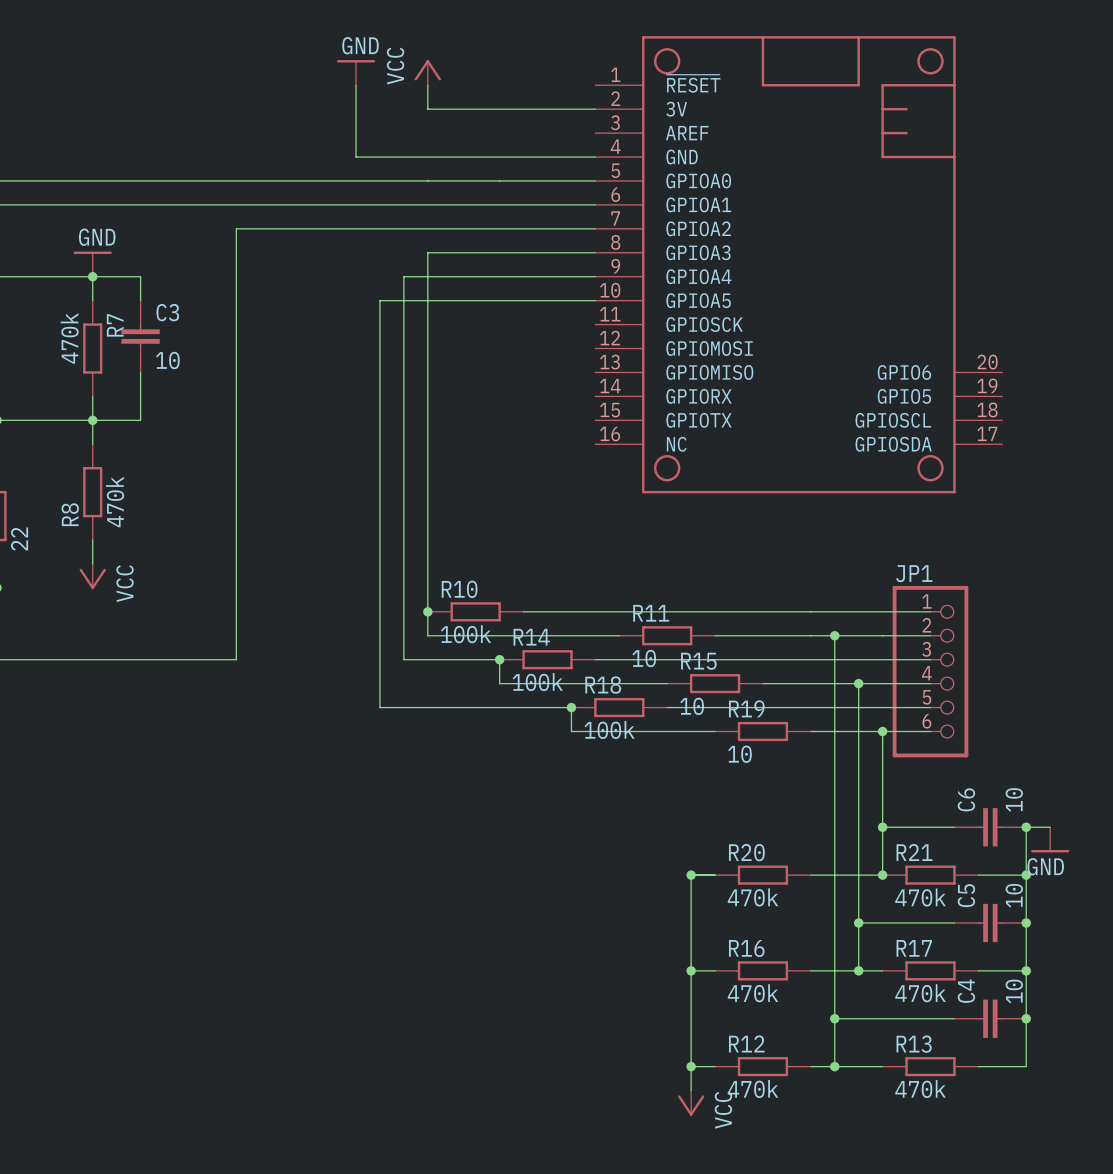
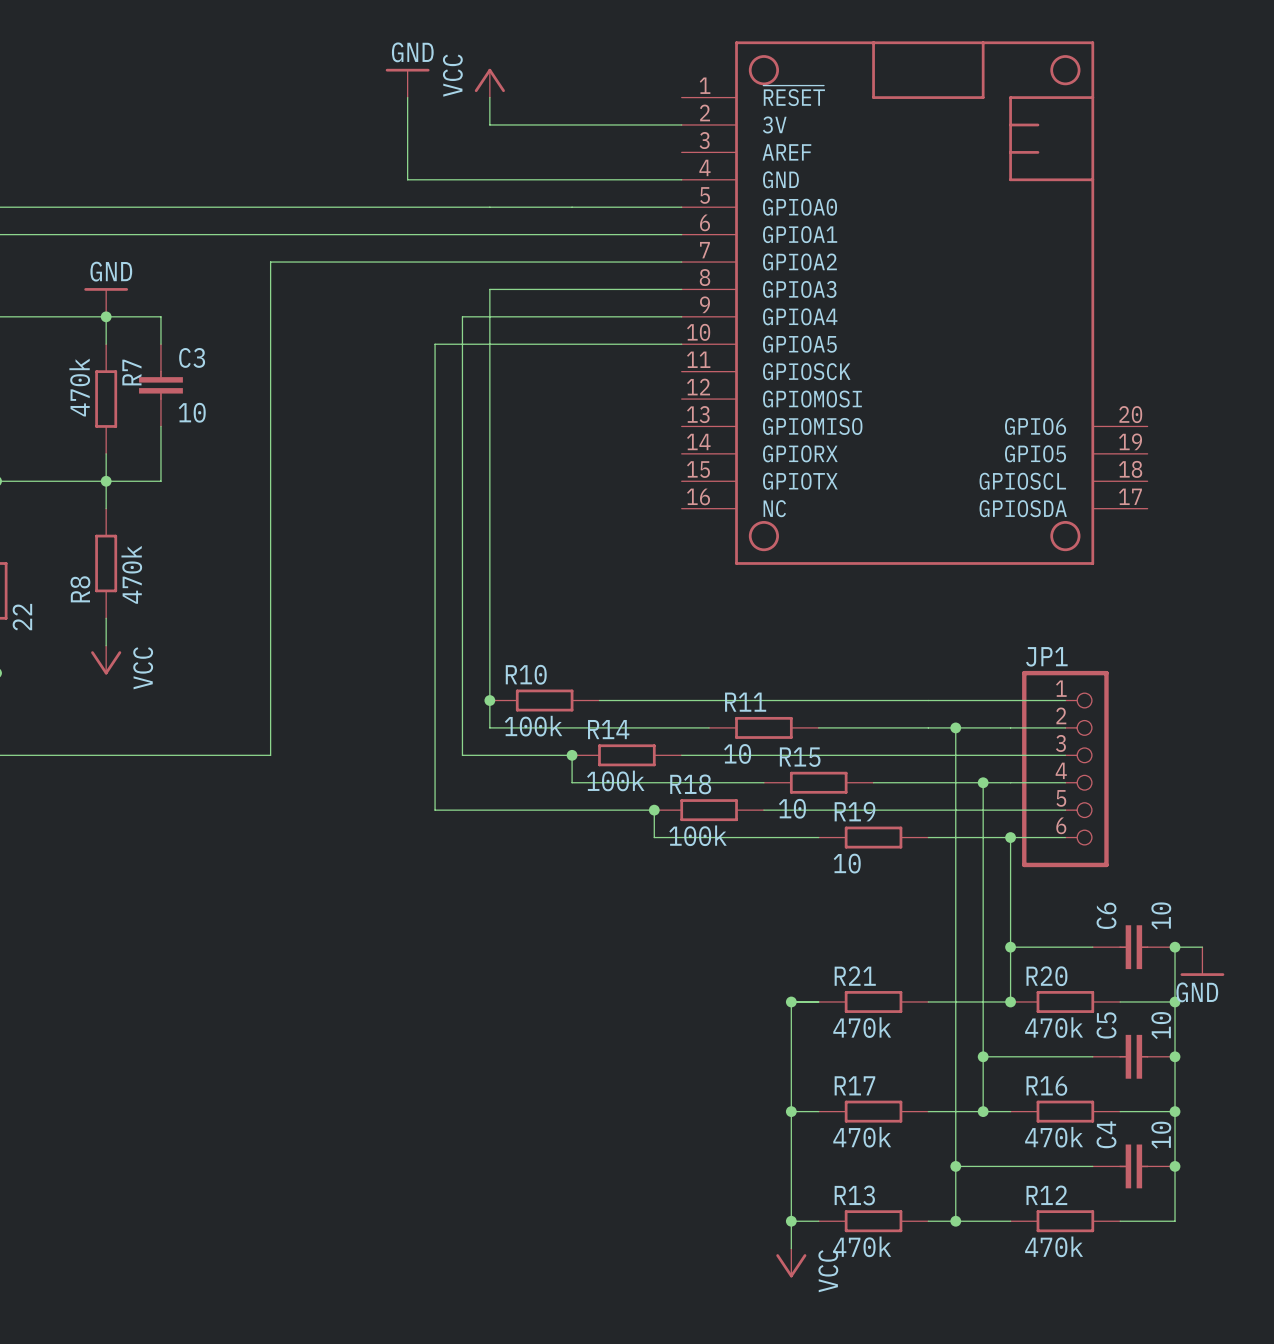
R20 name: R20 (746, 852) -> R21 (855, 976)
R21 name: R21 (914, 852) -> R20 (1046, 976)
R16 name: R16 (746, 948) -> R17 (854, 1085)
R17 name: R17 (914, 948) -> R16 (1046, 1086)
R12 name: R12 (746, 1043) -> R13 (854, 1195)
R13 name: R13 (914, 1044) -> R12 (1046, 1195)

